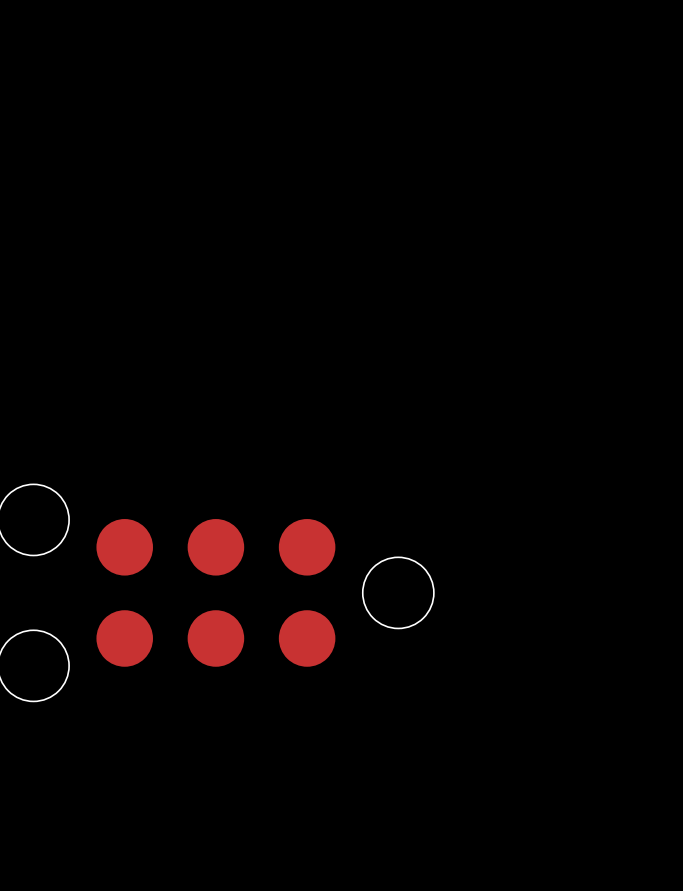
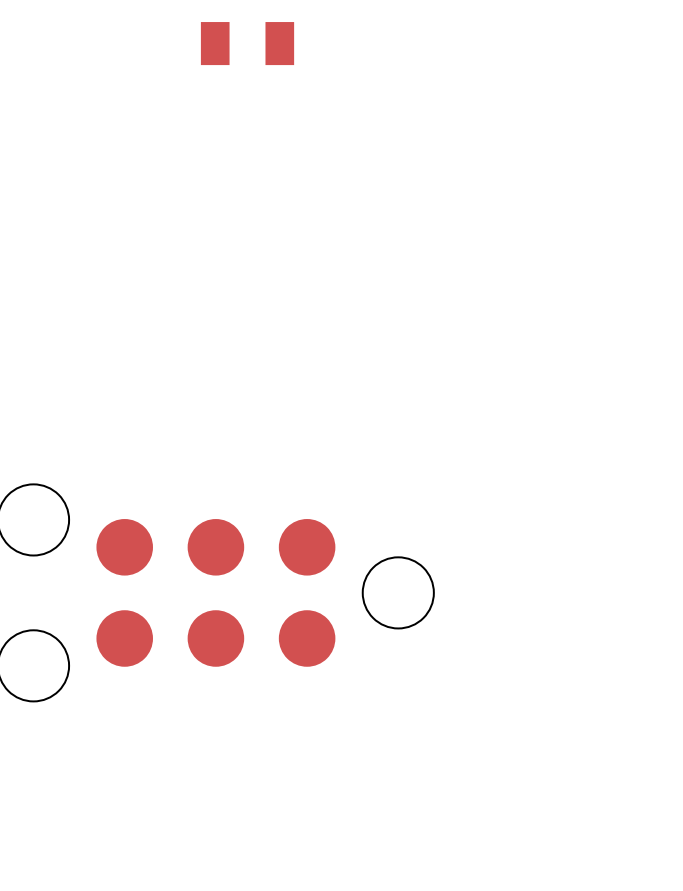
part: none -> (247, 43)

